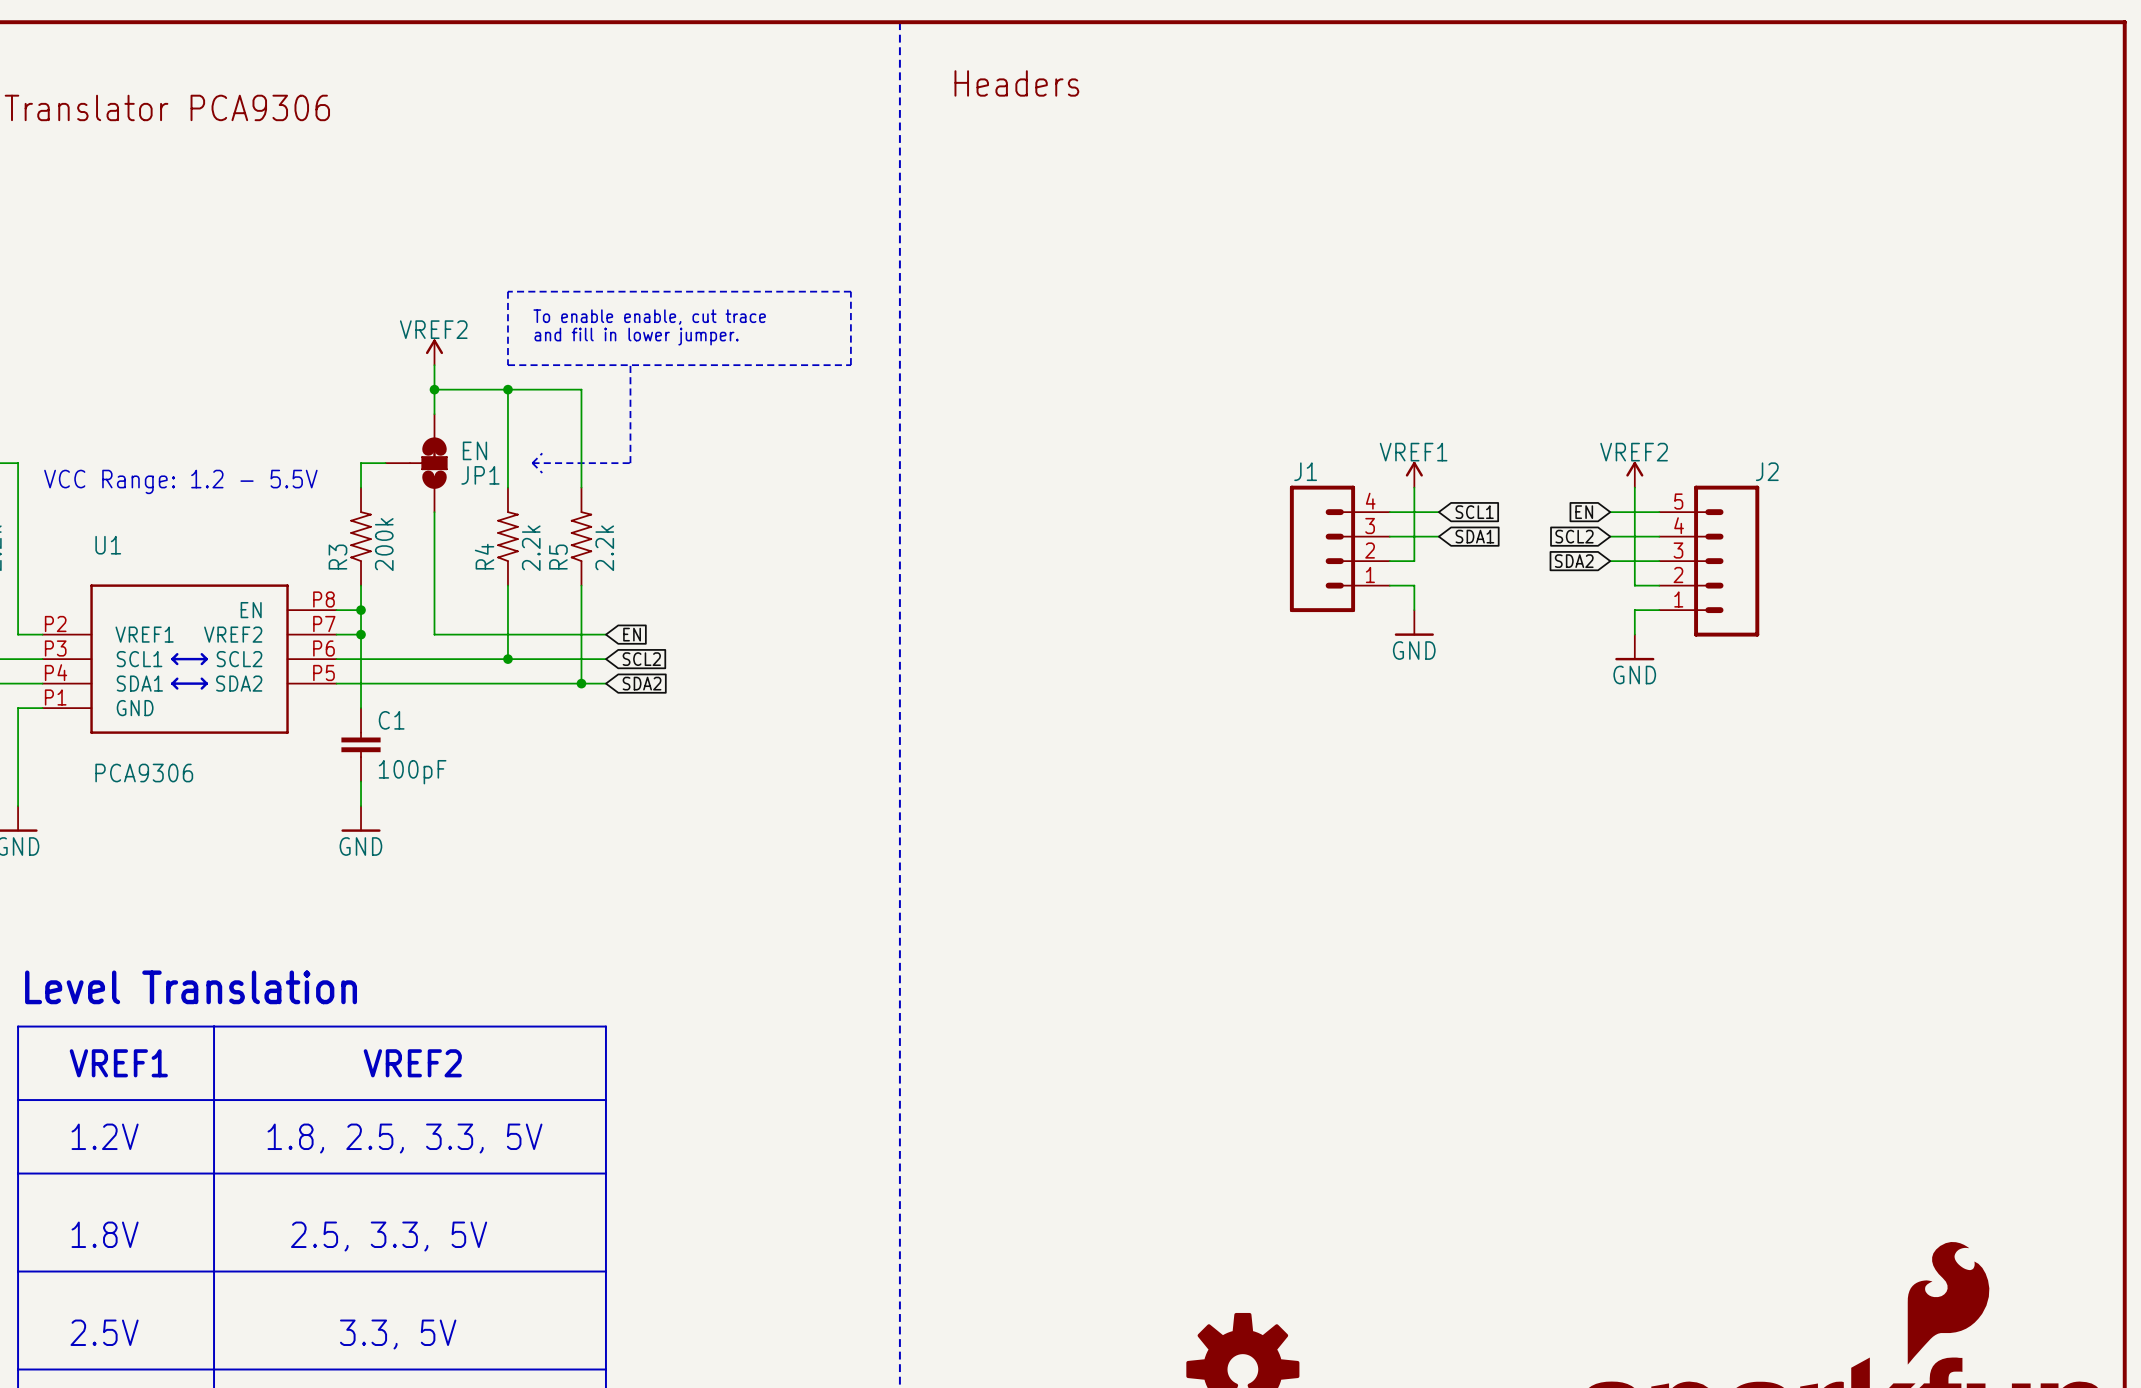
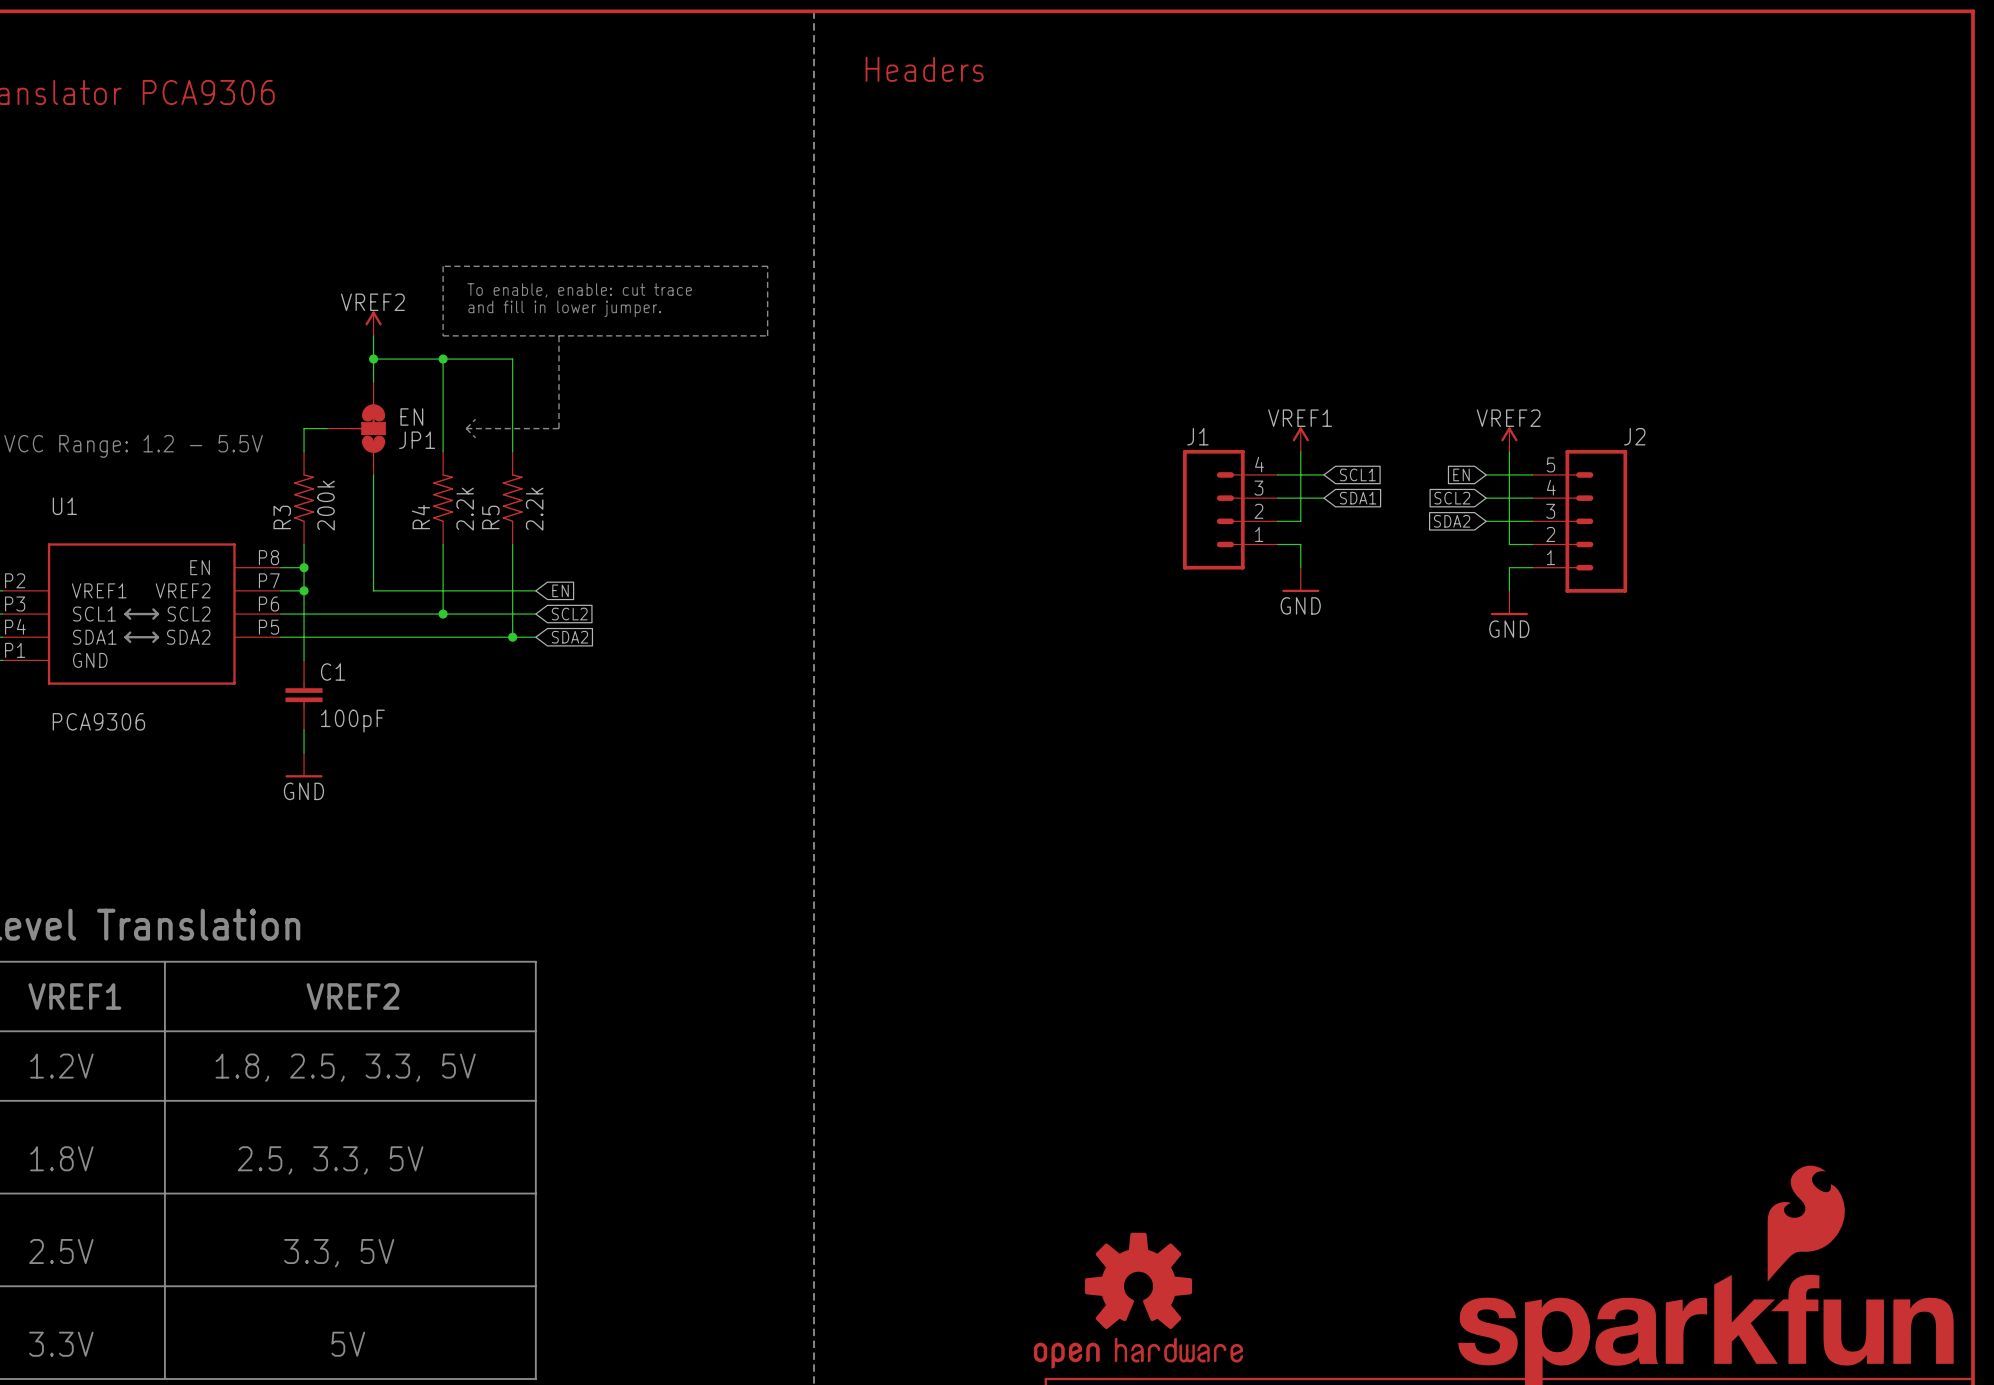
text: To enable enable, cut trace (649, 317) -> To enable, enable: cut trace (579, 290)

